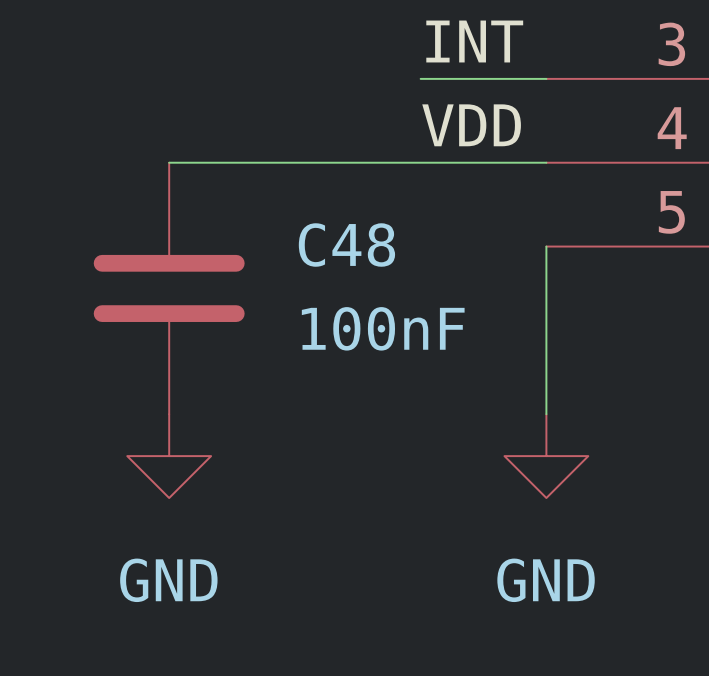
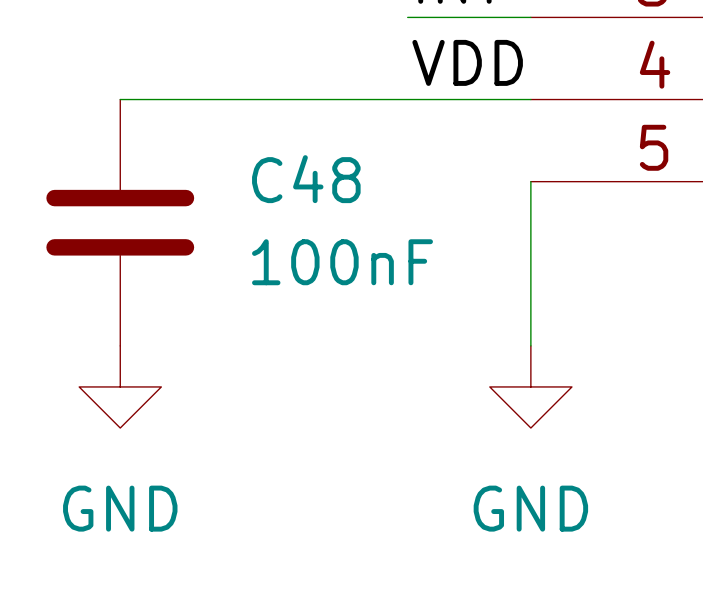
wire: none -> (120, 99) (161, 99)
C48 position: (169, 288) -> (120, 222)
power symbol position: GND (169, 456) -> GND (120, 386)

